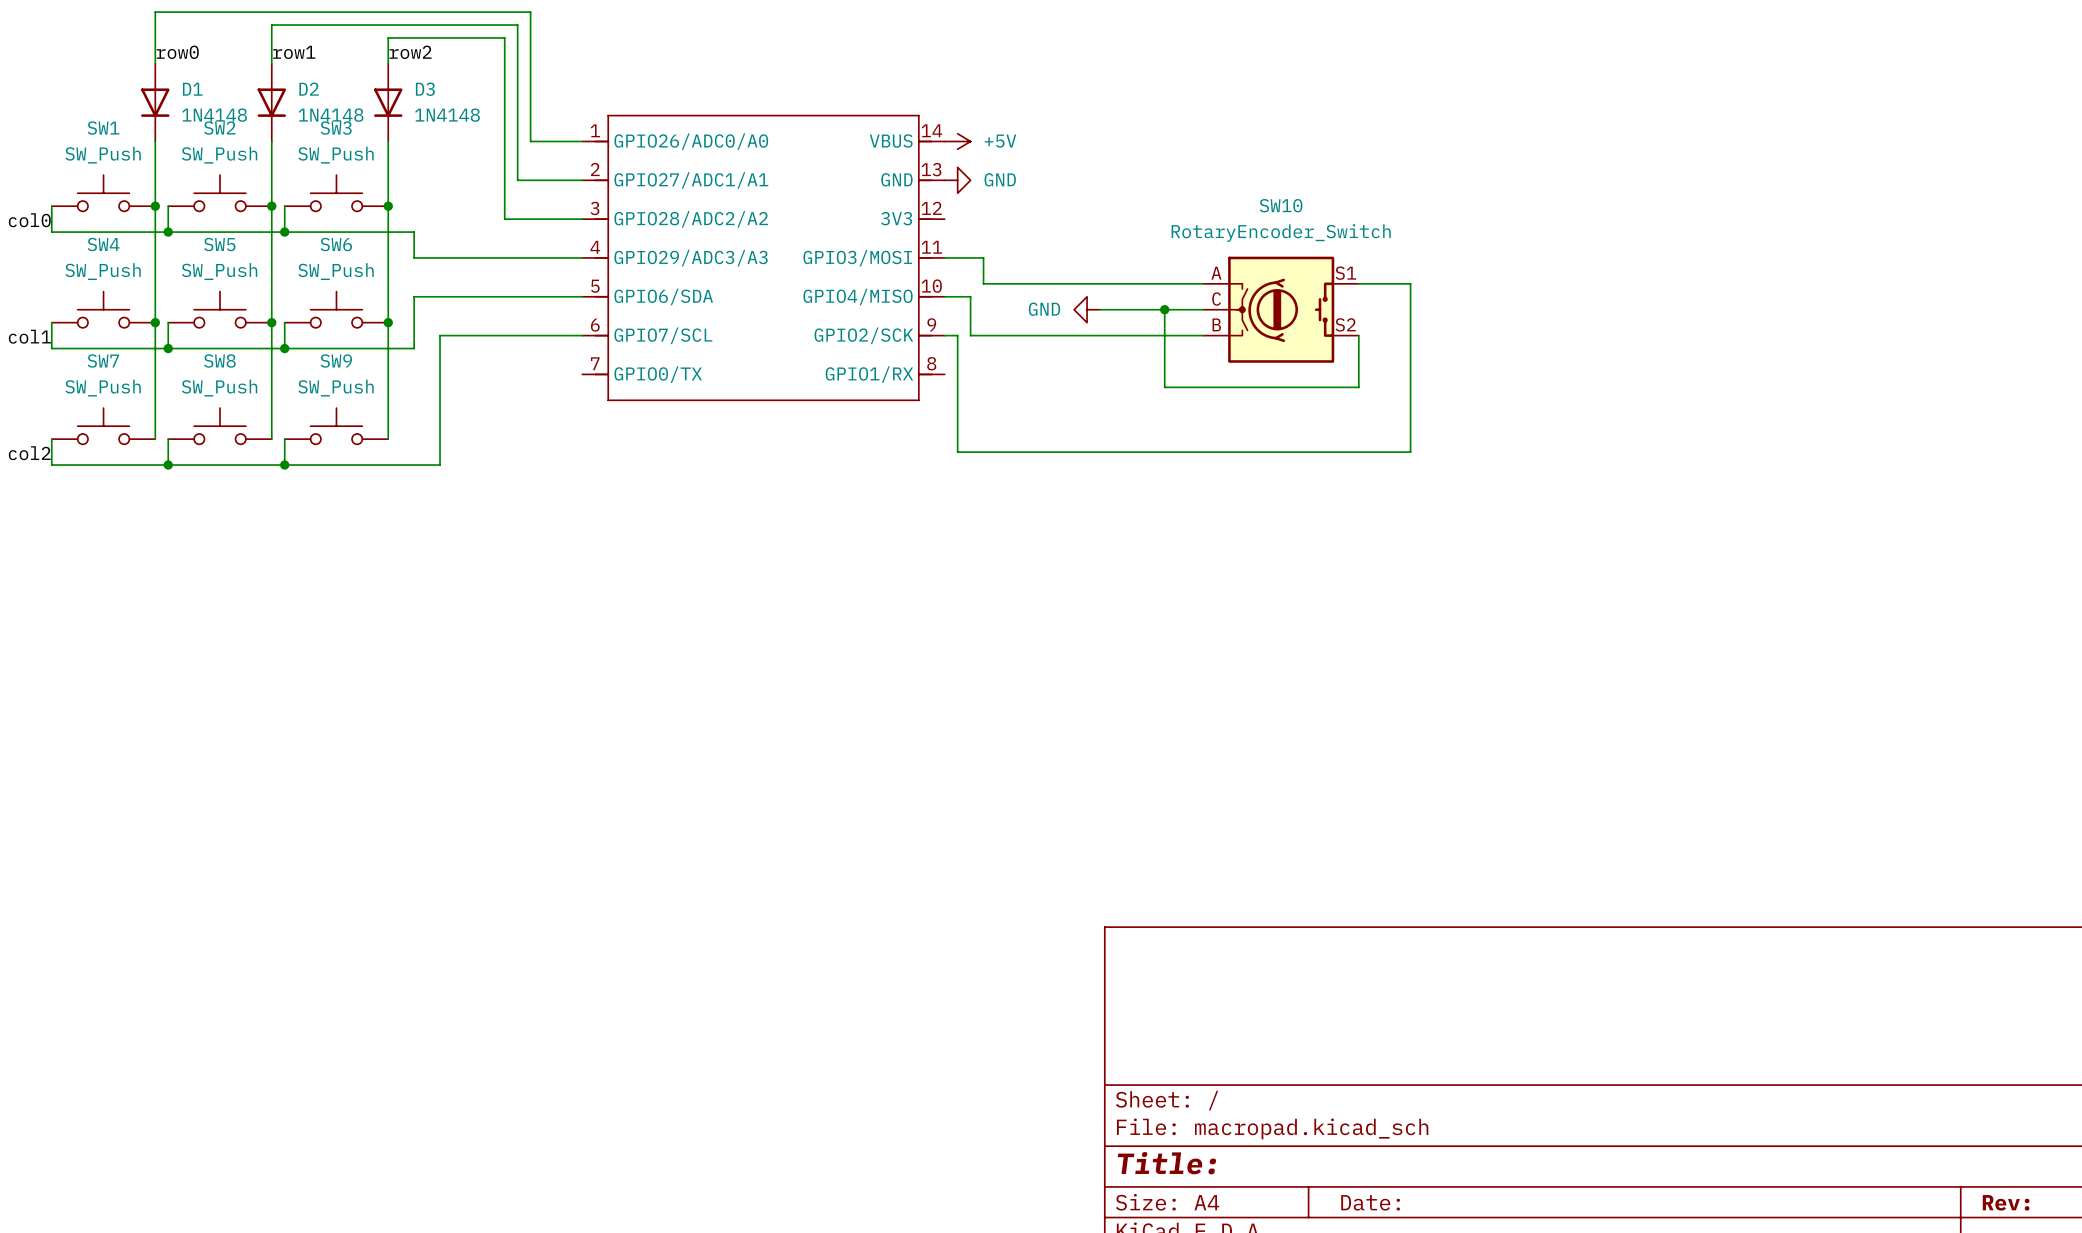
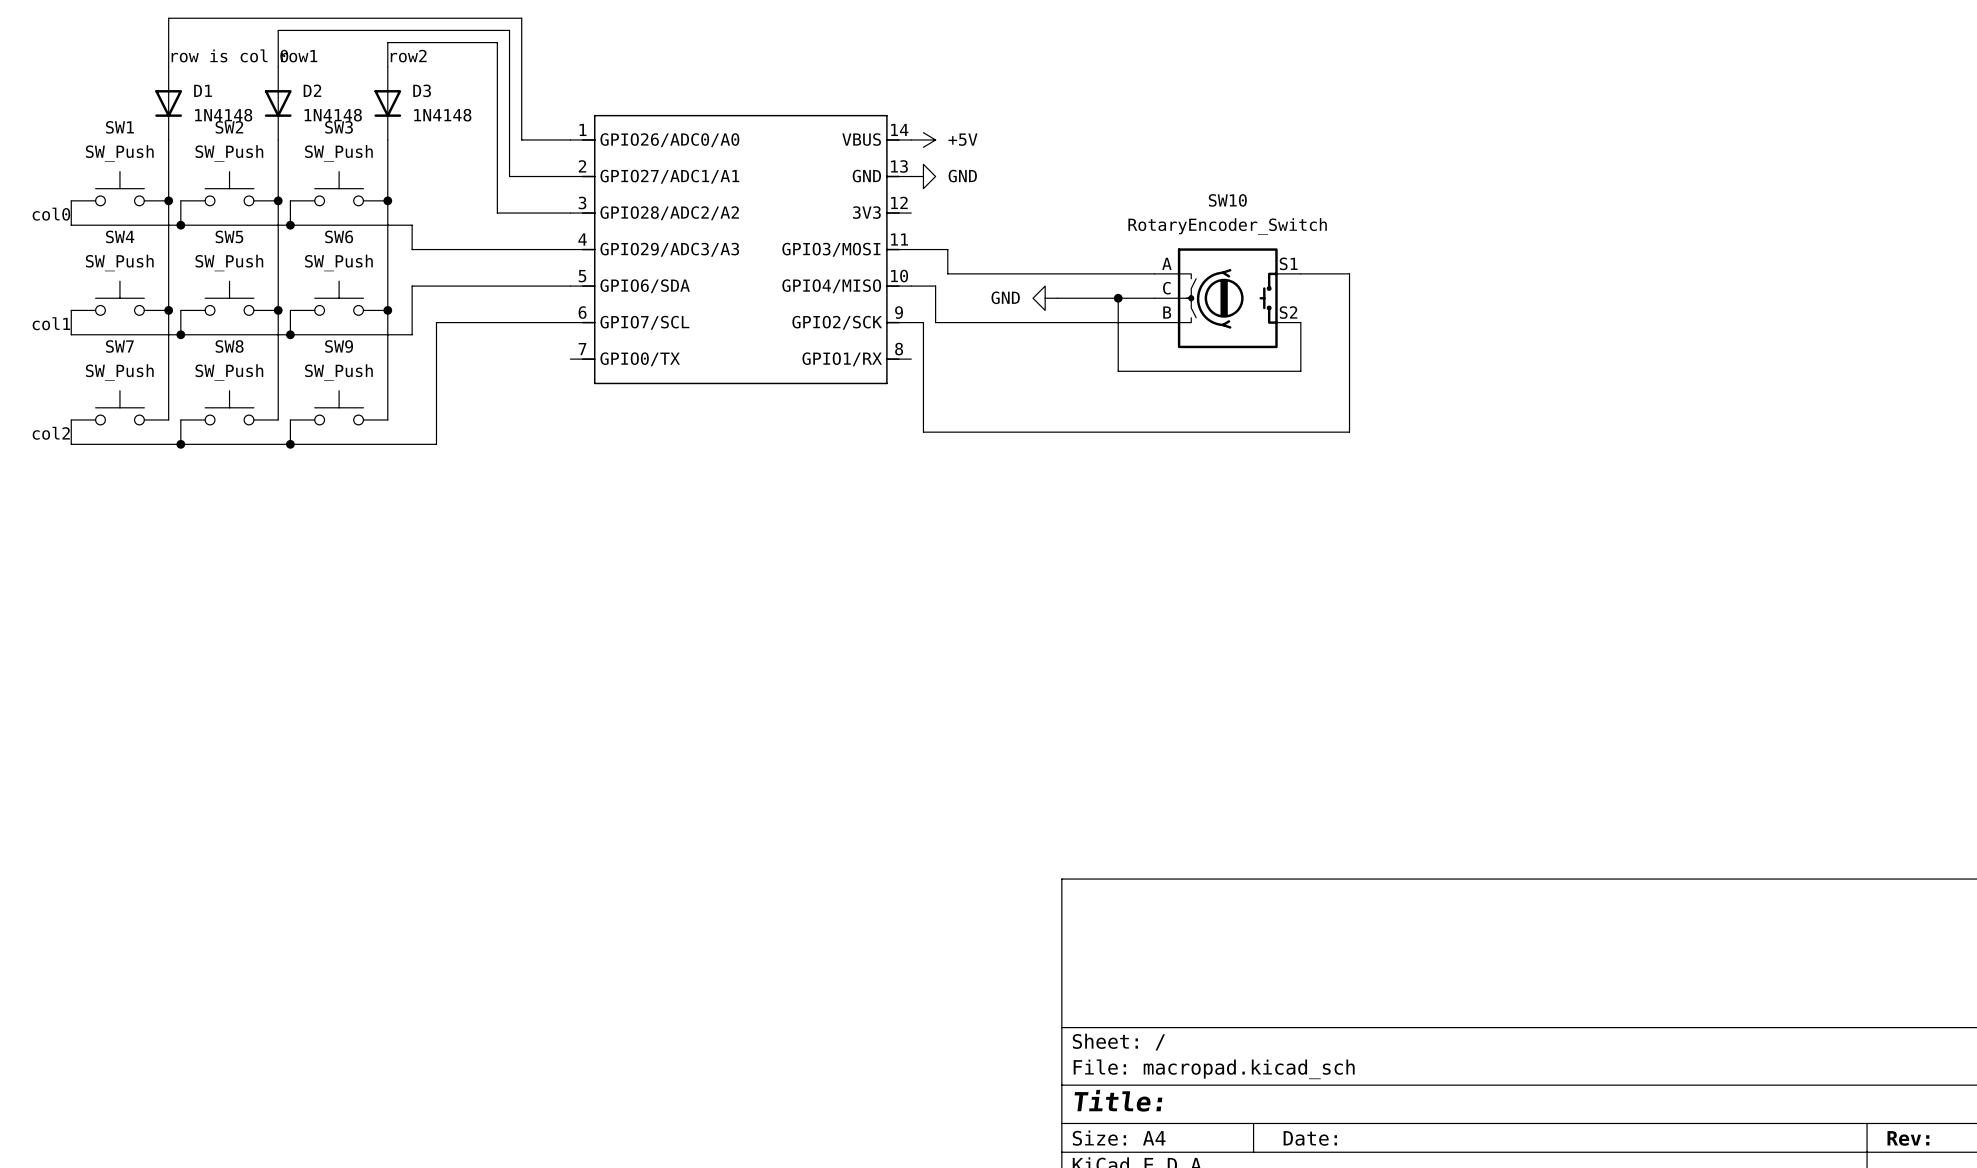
label: row0 (177, 52) -> row is col 0 (229, 55)

